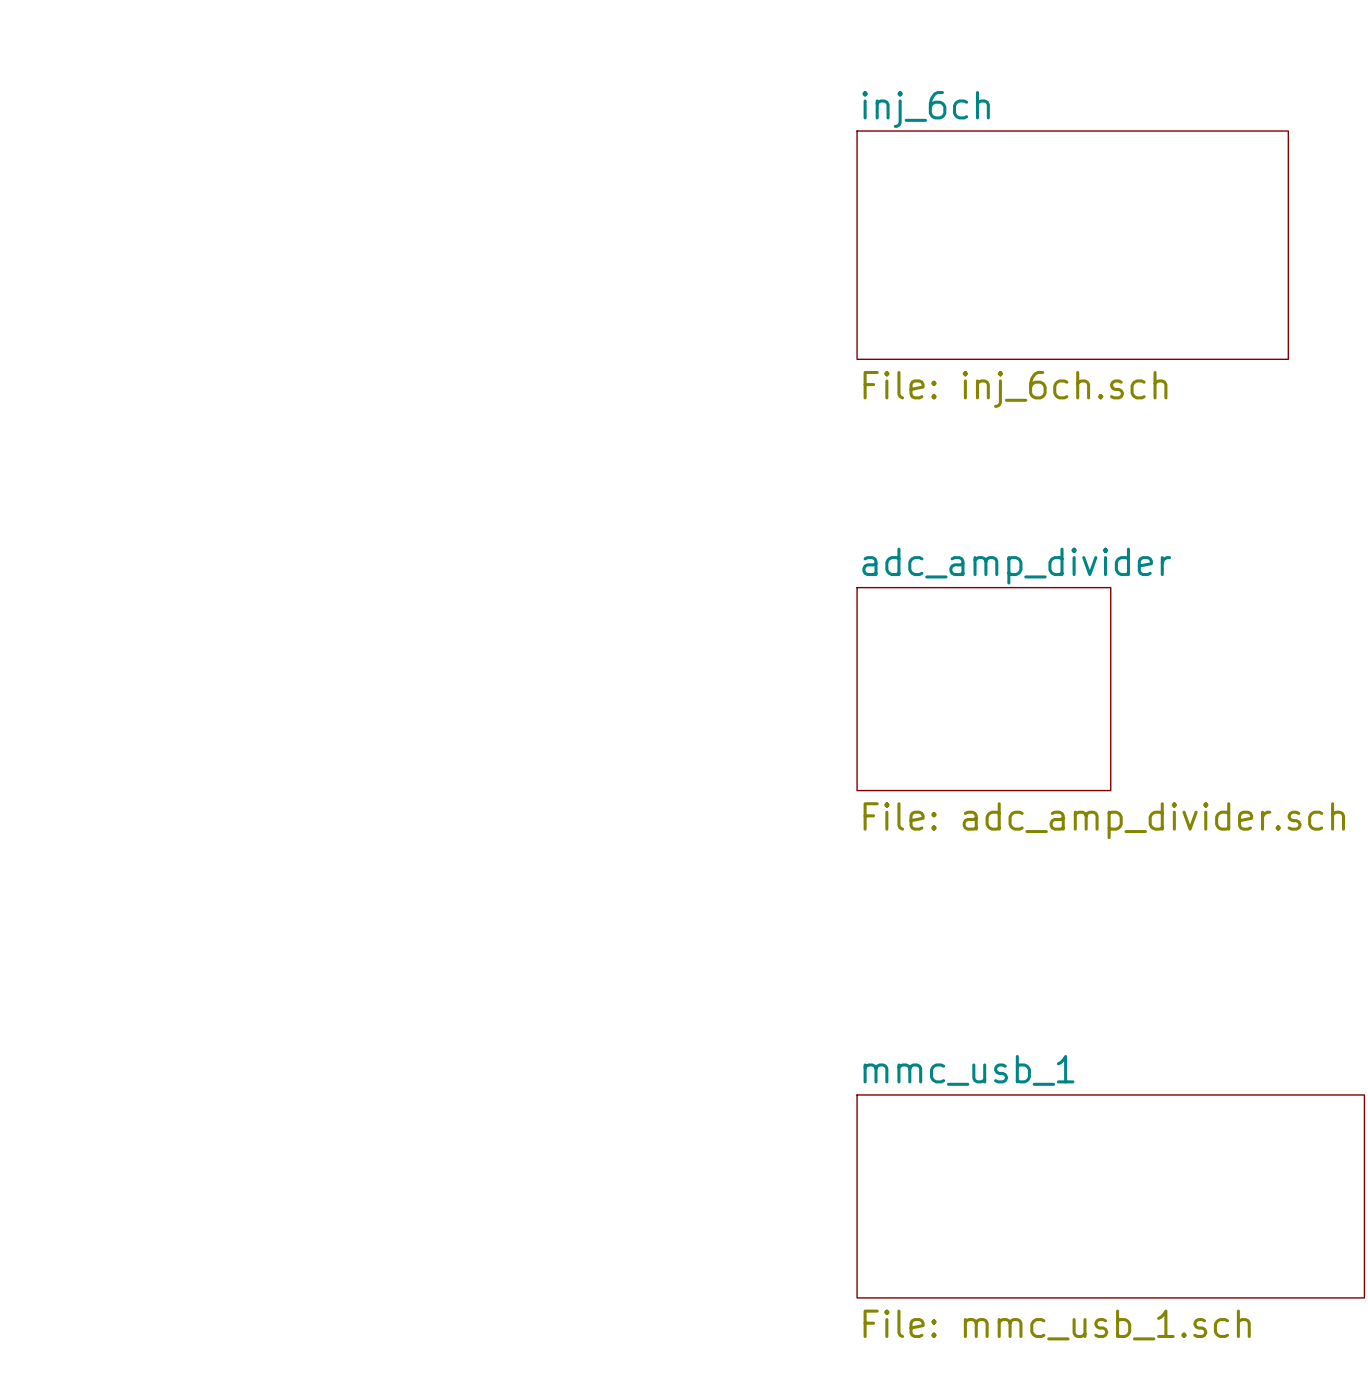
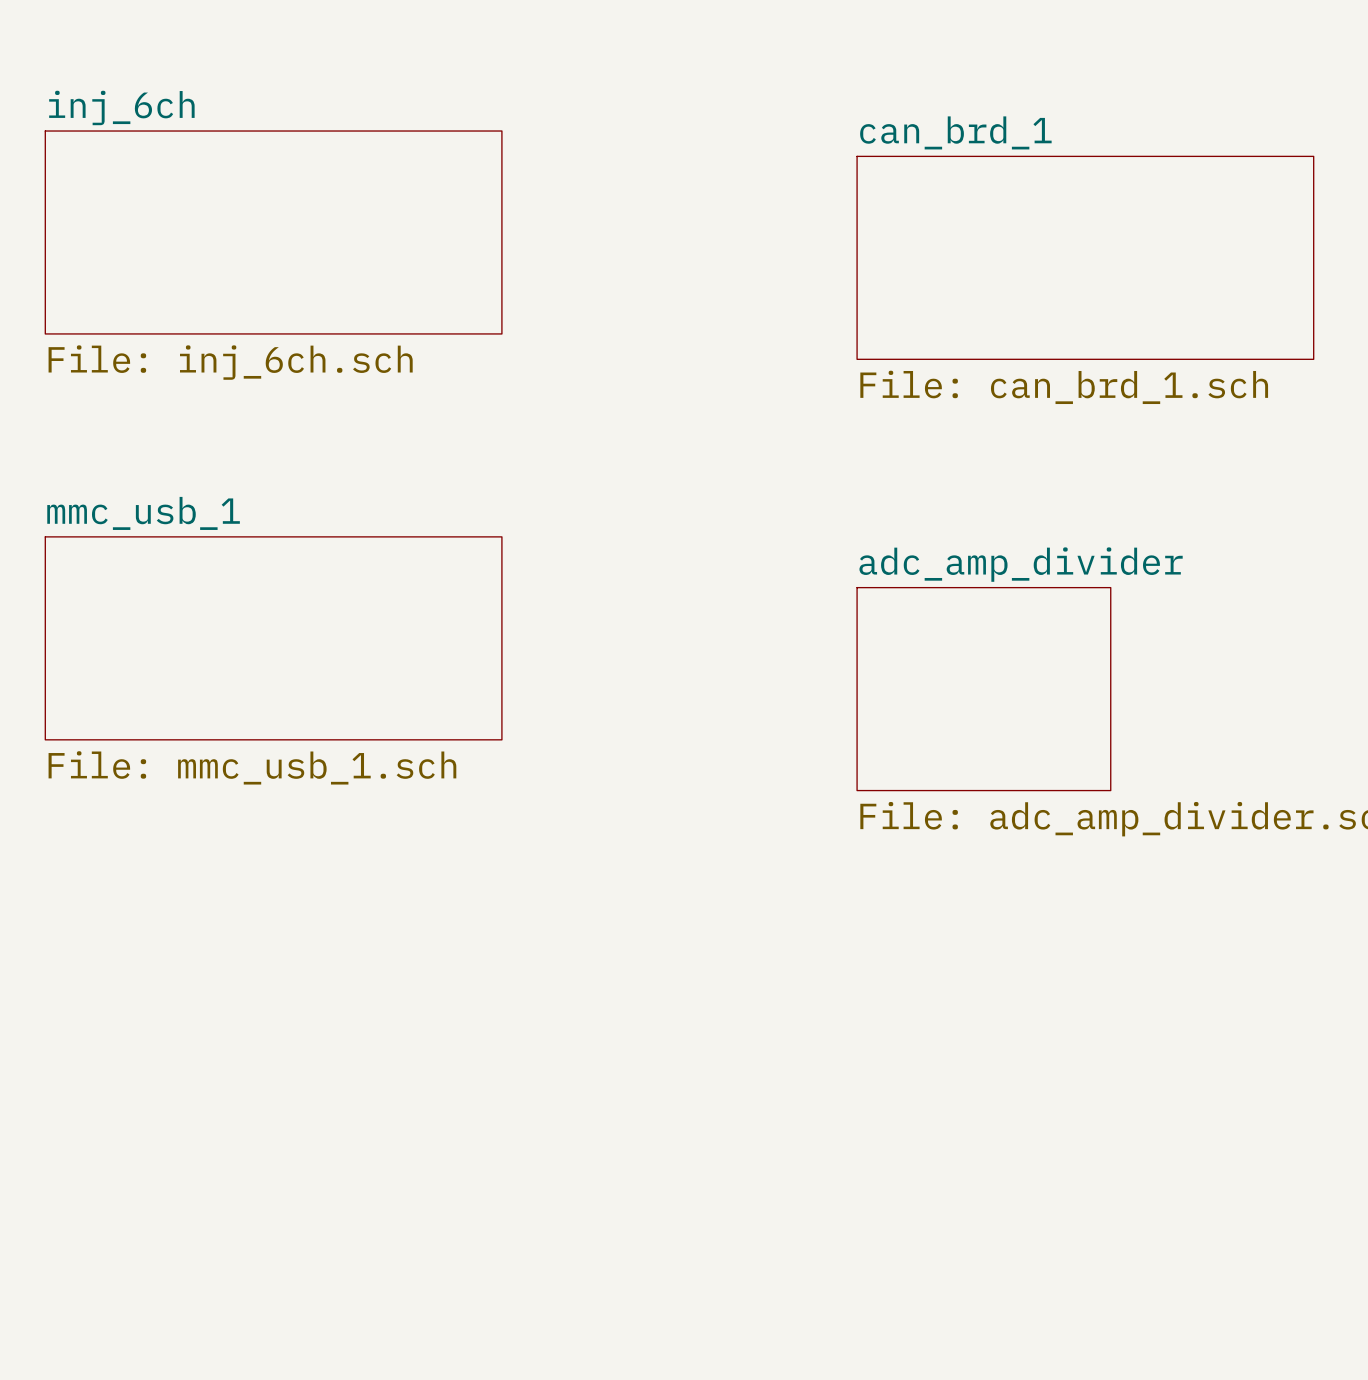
sheet inj_6ch shape: [857, 131, 1289, 360] -> [45, 131, 502, 334]
sheet can_brd_1: none -> File: can_brd_1.sch (1085, 257)
sheet mmc_usb_1 shape: [857, 1094, 1365, 1298] -> [45, 536, 502, 740]

